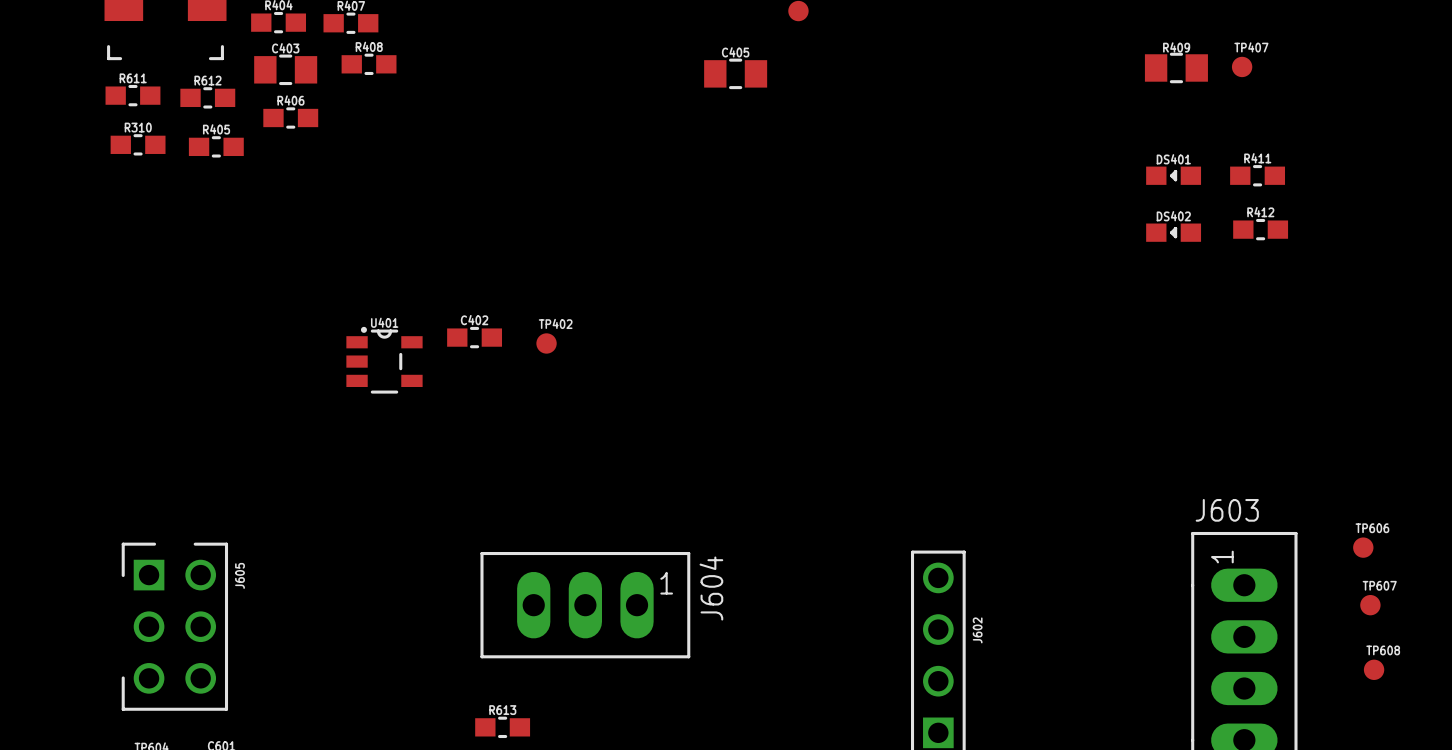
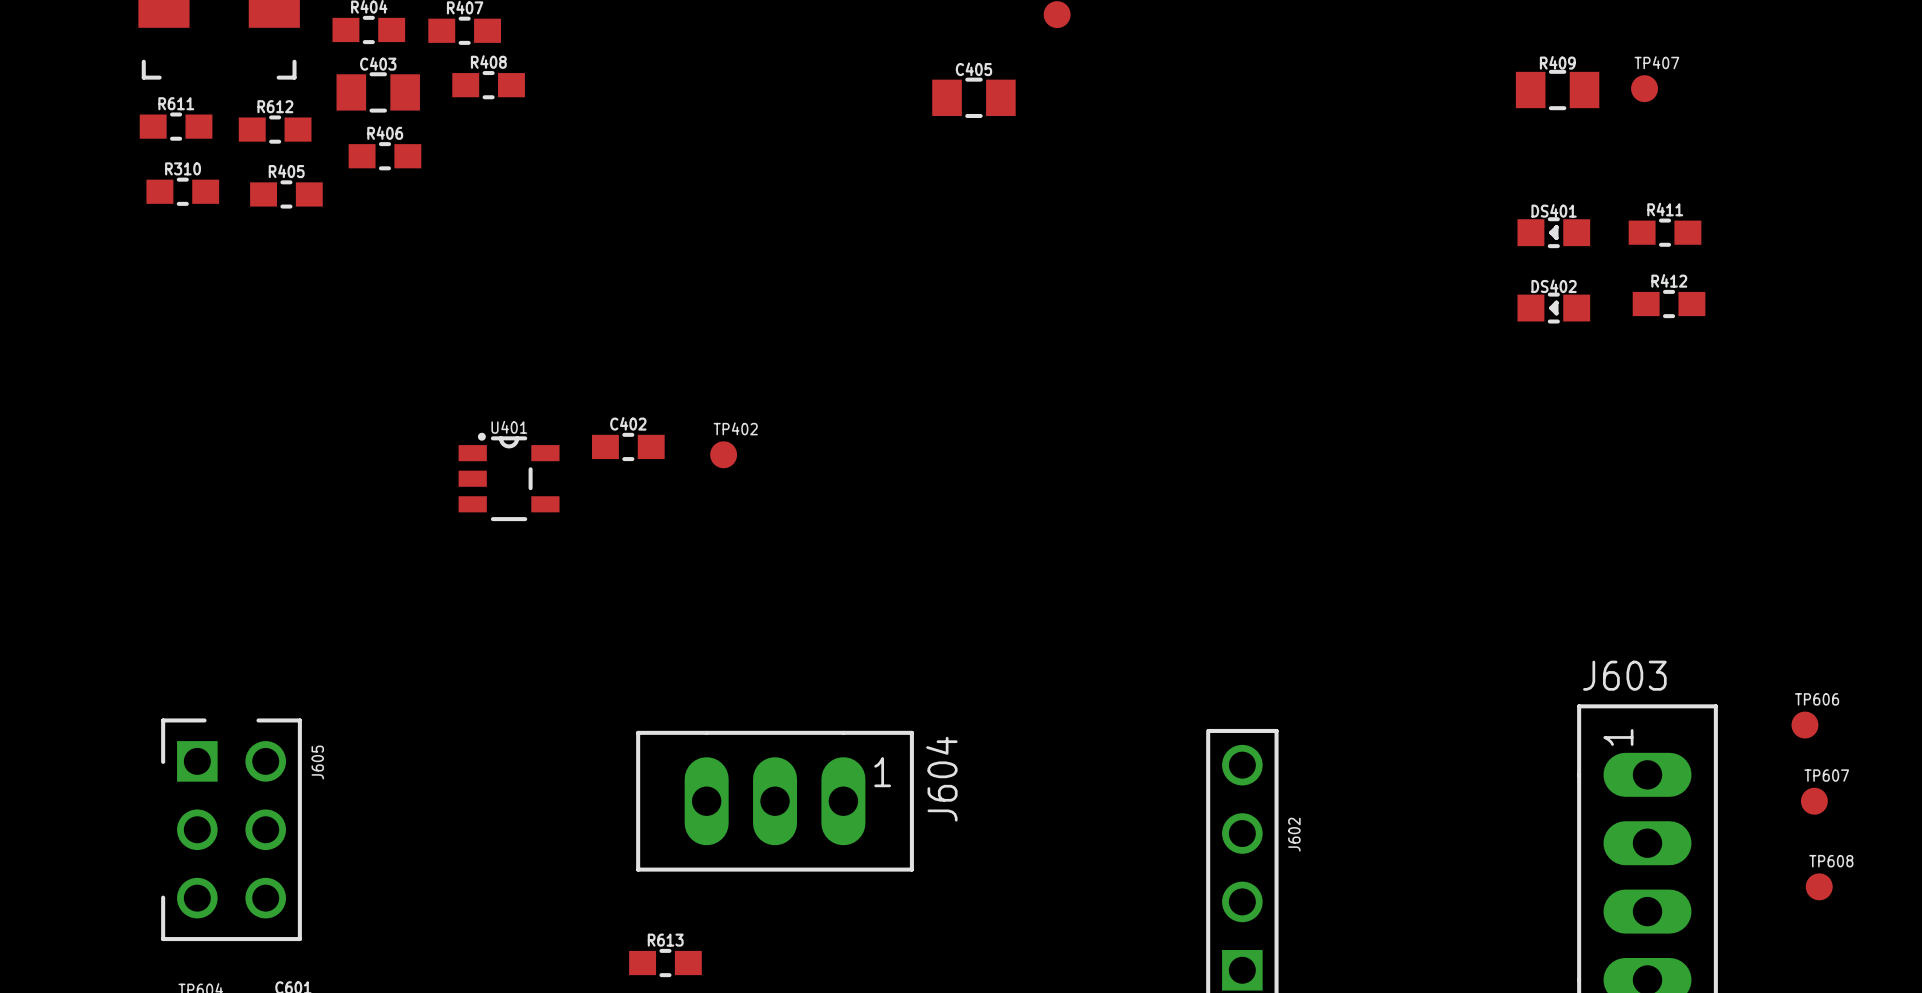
DS401 footprint: [1146, 166, 1202, 185] -> [1517, 217, 1591, 249]
DS402 footprint: [1146, 223, 1202, 242] -> [1517, 292, 1591, 324]

